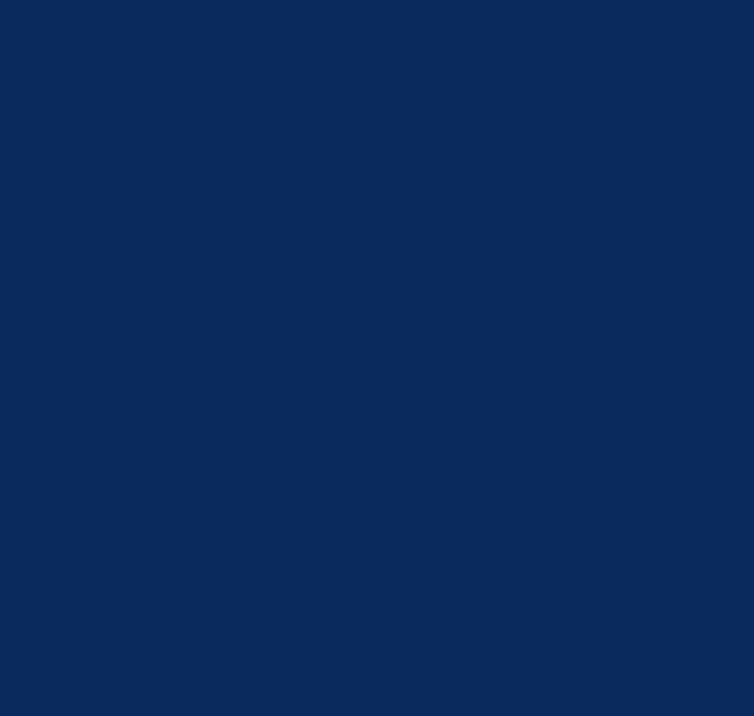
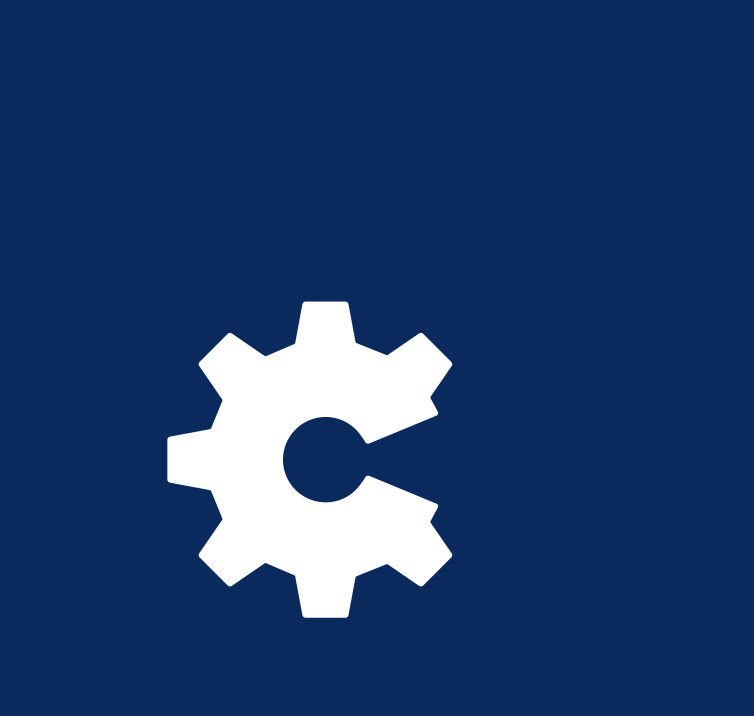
drawing: none -> [167, 301, 453, 618]

